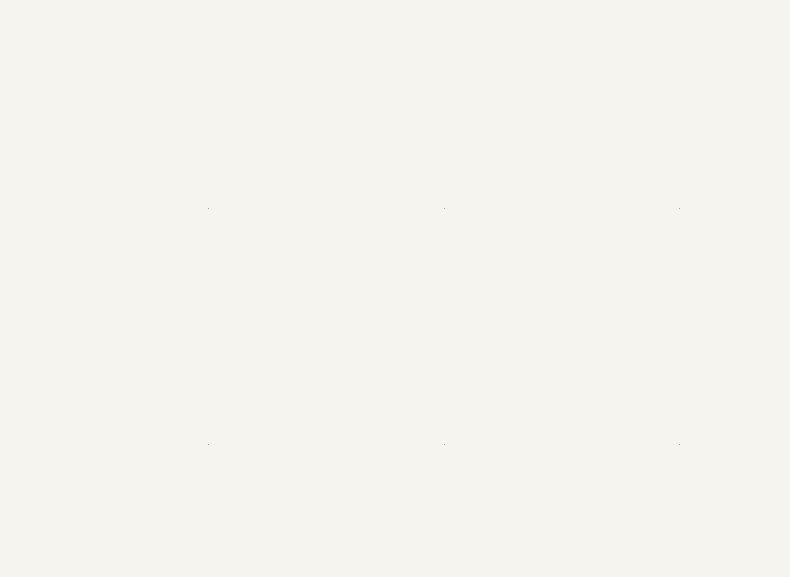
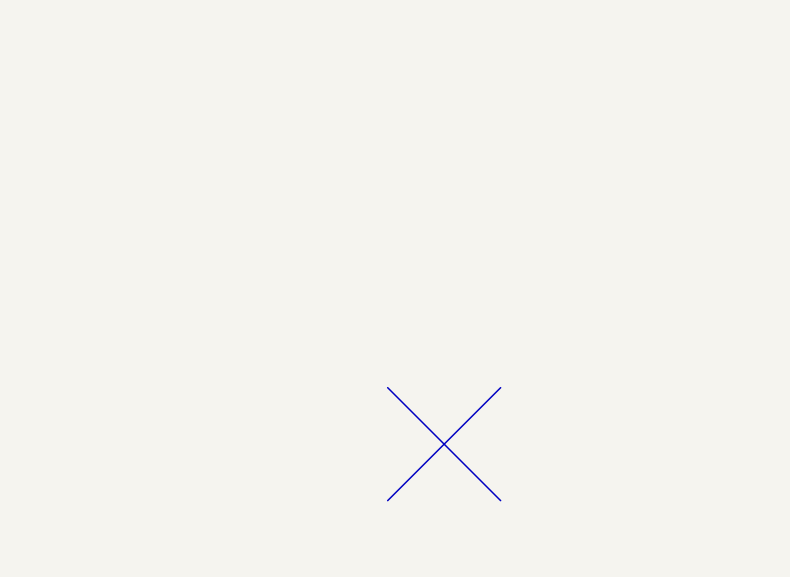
no-connect mark: none -> (444, 444)

